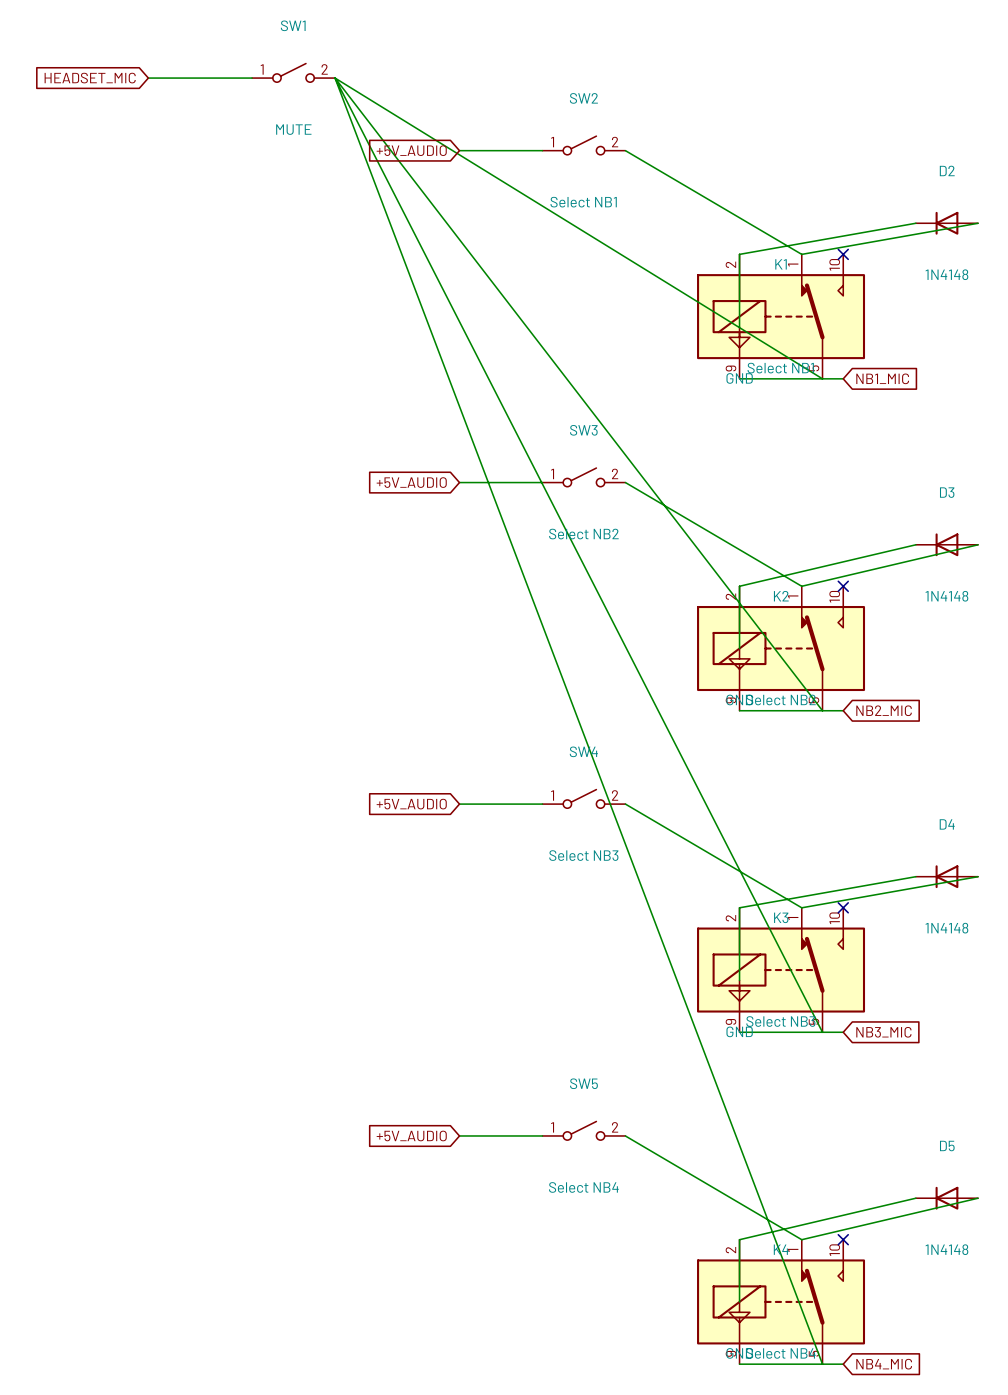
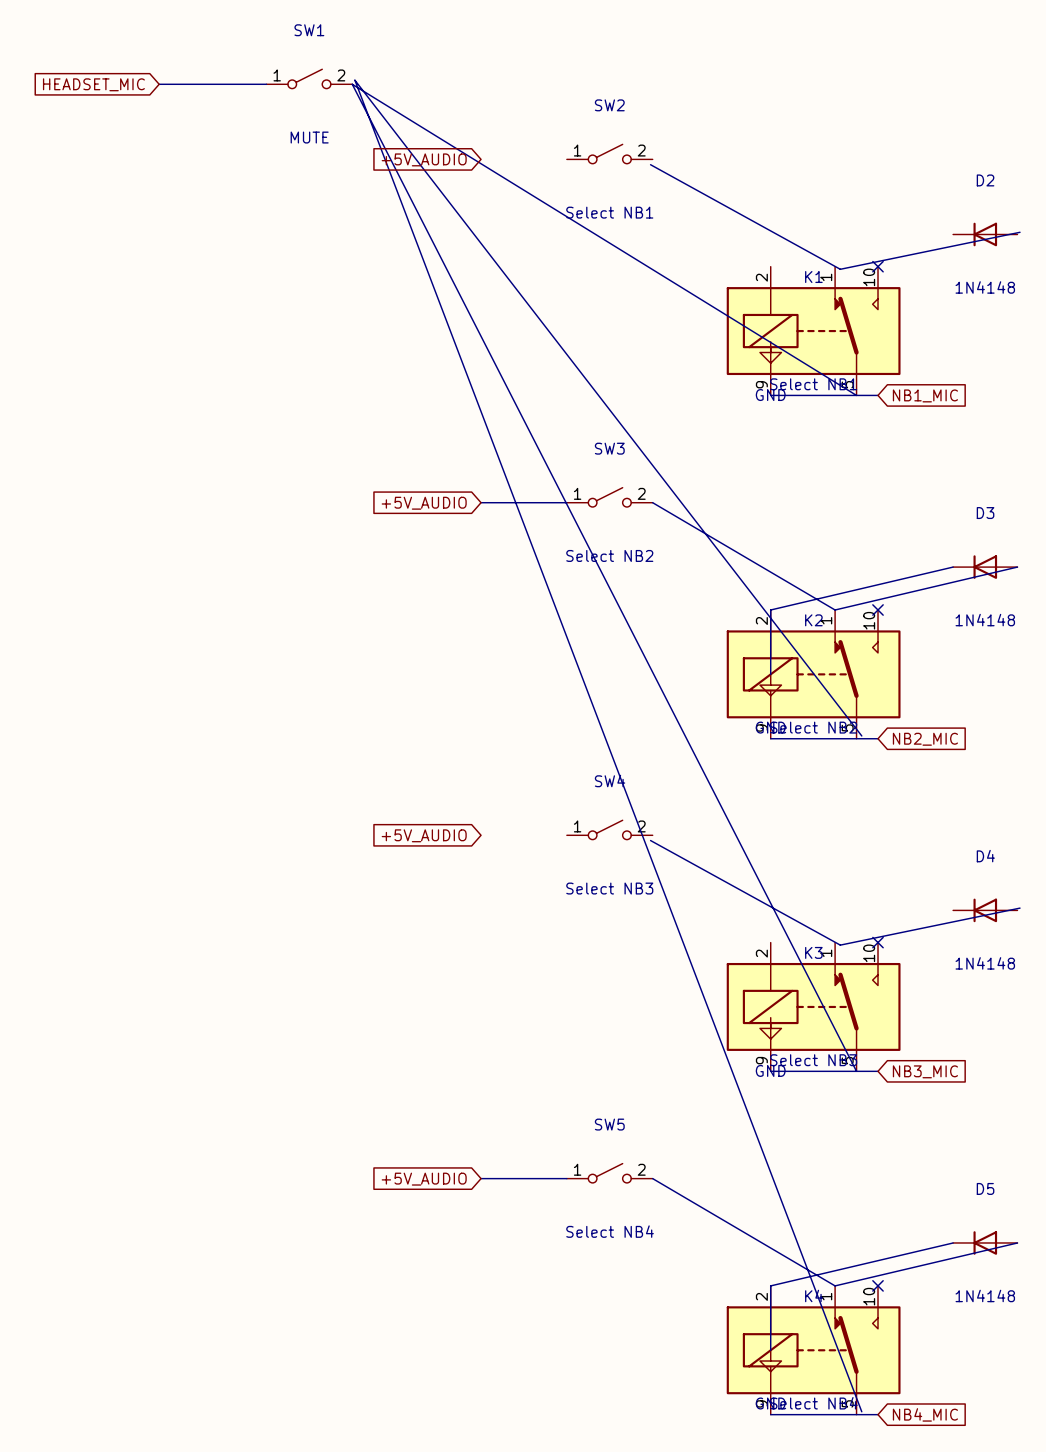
wire: (459, 150) (542, 150) -> none
wire: (625, 150) (801, 254) (978, 223) -> none
wire: none -> (650, 164) (840, 269) (1020, 232)
wire: (915, 223) (739, 254) (739, 326) -> none
wire: none -> (861, 735) (354, 80) (861, 1411)
wire: (822, 710) (335, 78) (822, 1364) -> none
wire: (459, 804) (542, 804) -> none
wire: (625, 804) (801, 907) (978, 876) -> none
wire: none -> (650, 840) (840, 945) (1020, 908)
wire: (915, 876) (739, 907) (739, 980) -> none

